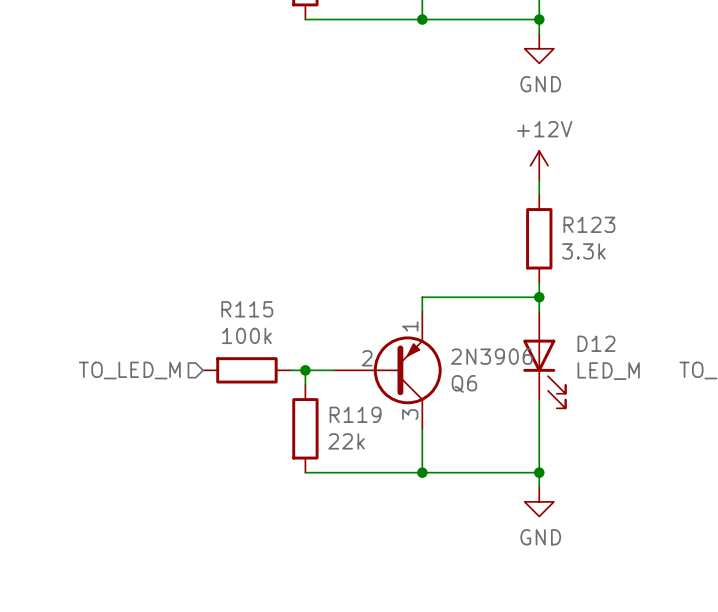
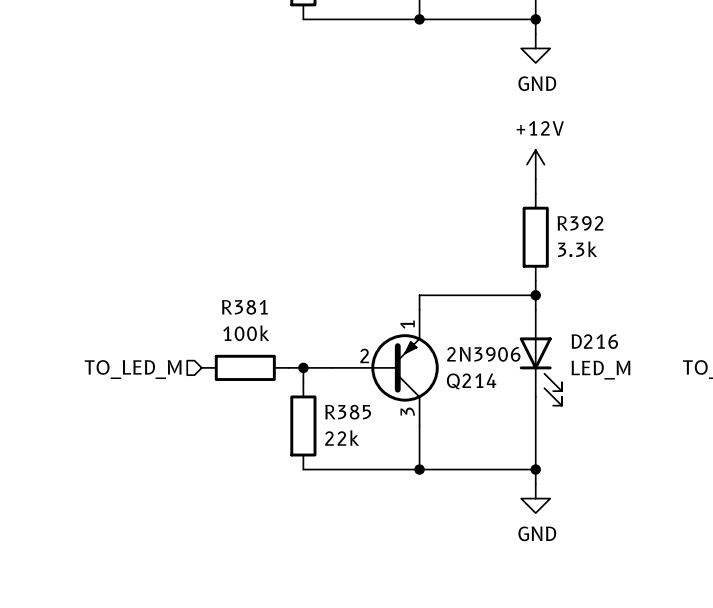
R123 name: R123 (589, 224) -> R392 (580, 223)
R115 name: R115 (247, 309) -> R381 (244, 307)
D12 name: D12 (596, 343) -> D216 (594, 341)
Q6 name: Q6 (464, 383) -> Q214 (471, 381)
R119 name: R119 (355, 414) -> R385 (348, 412)

